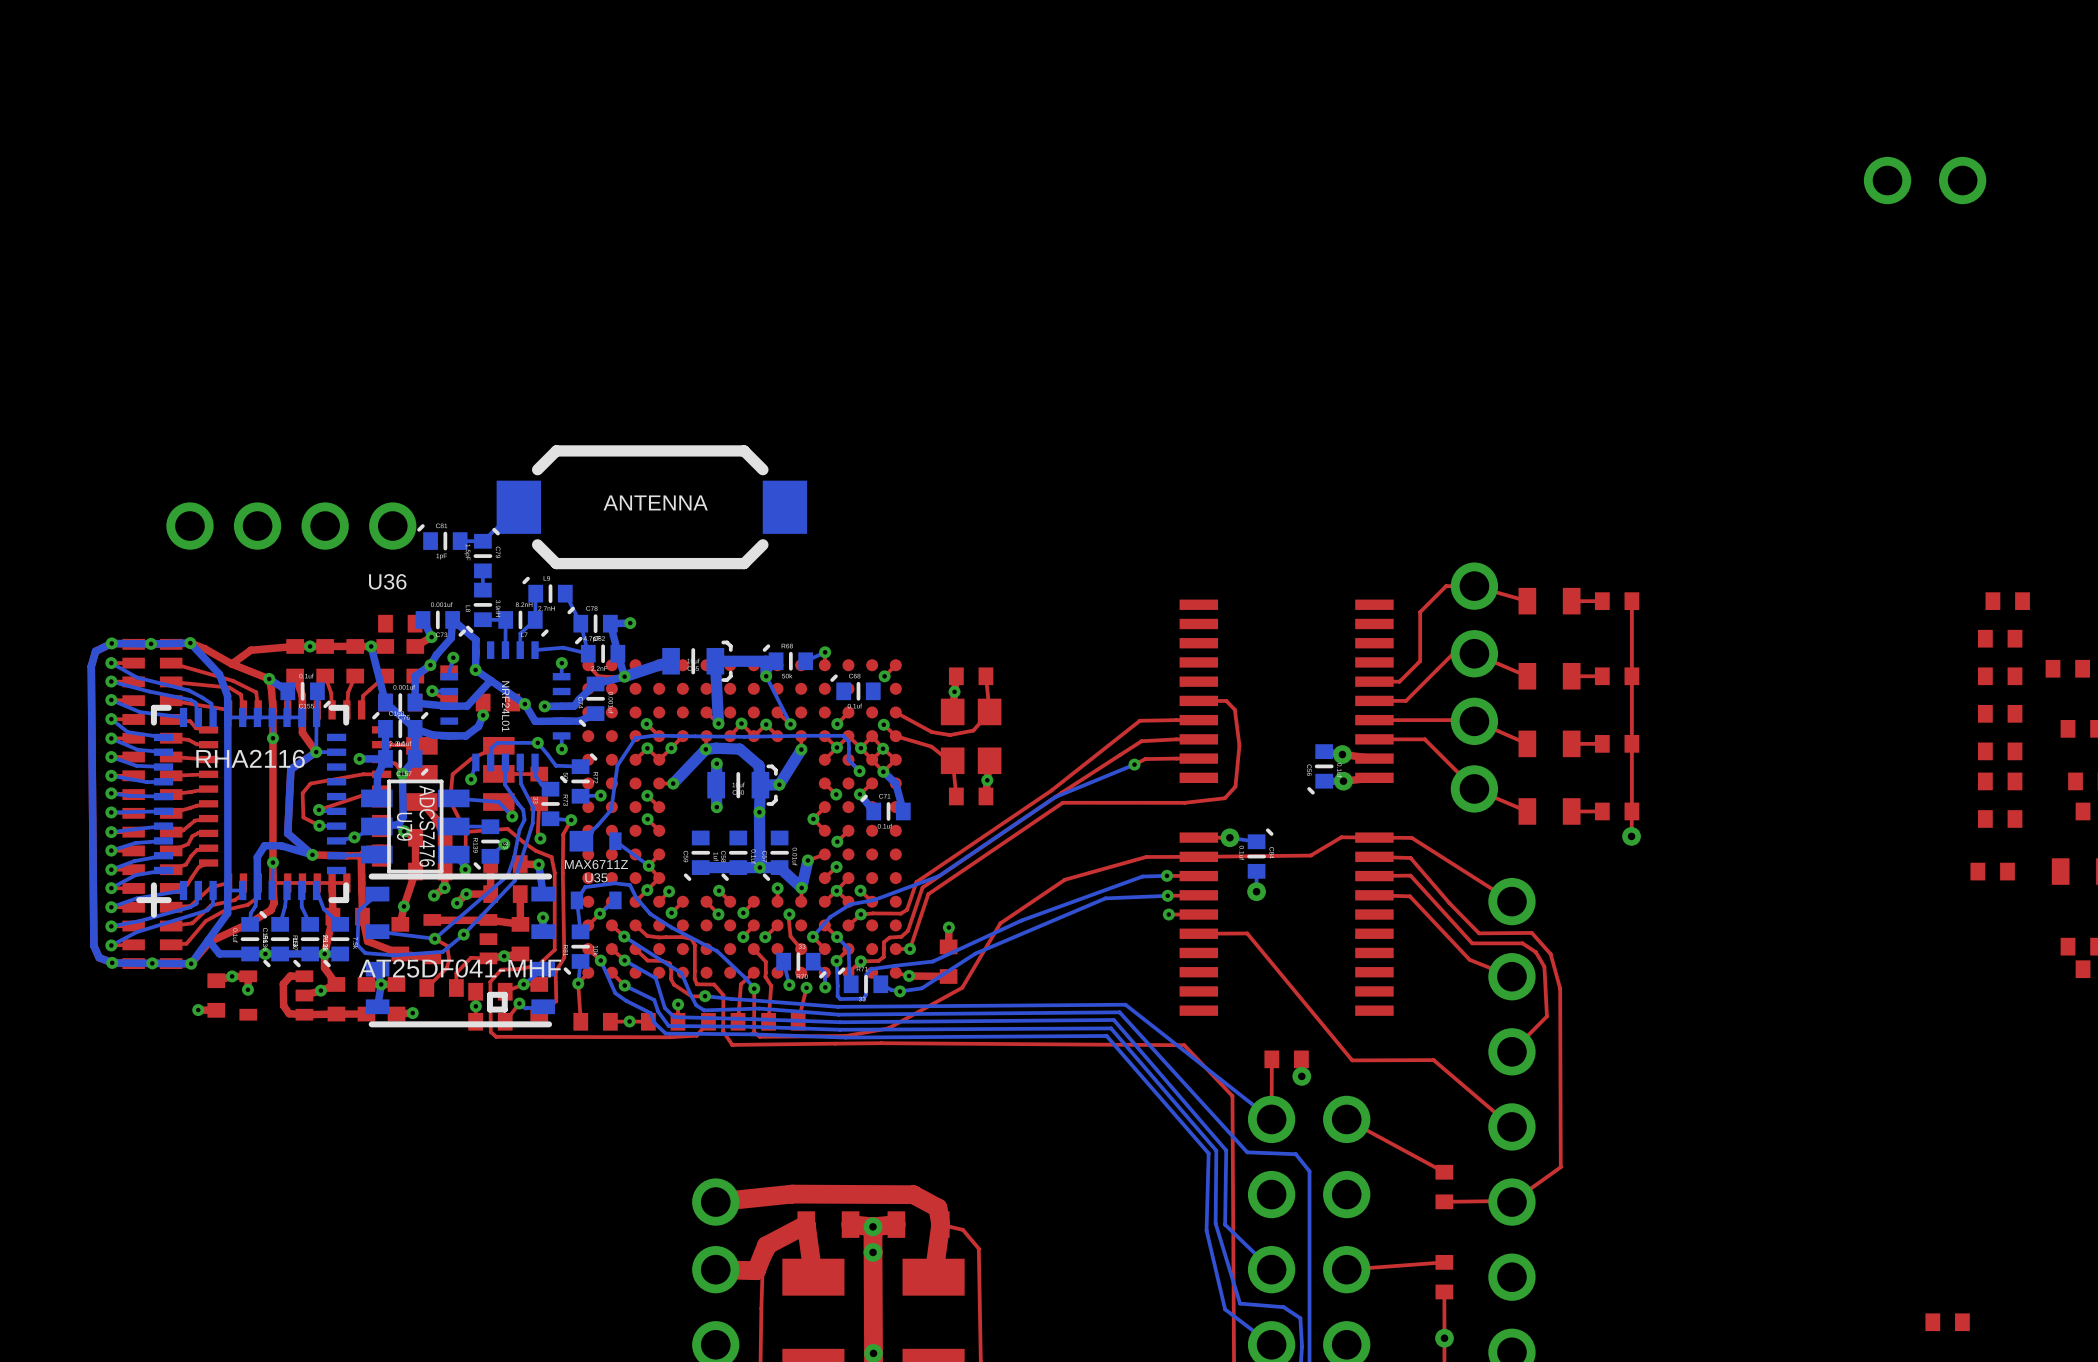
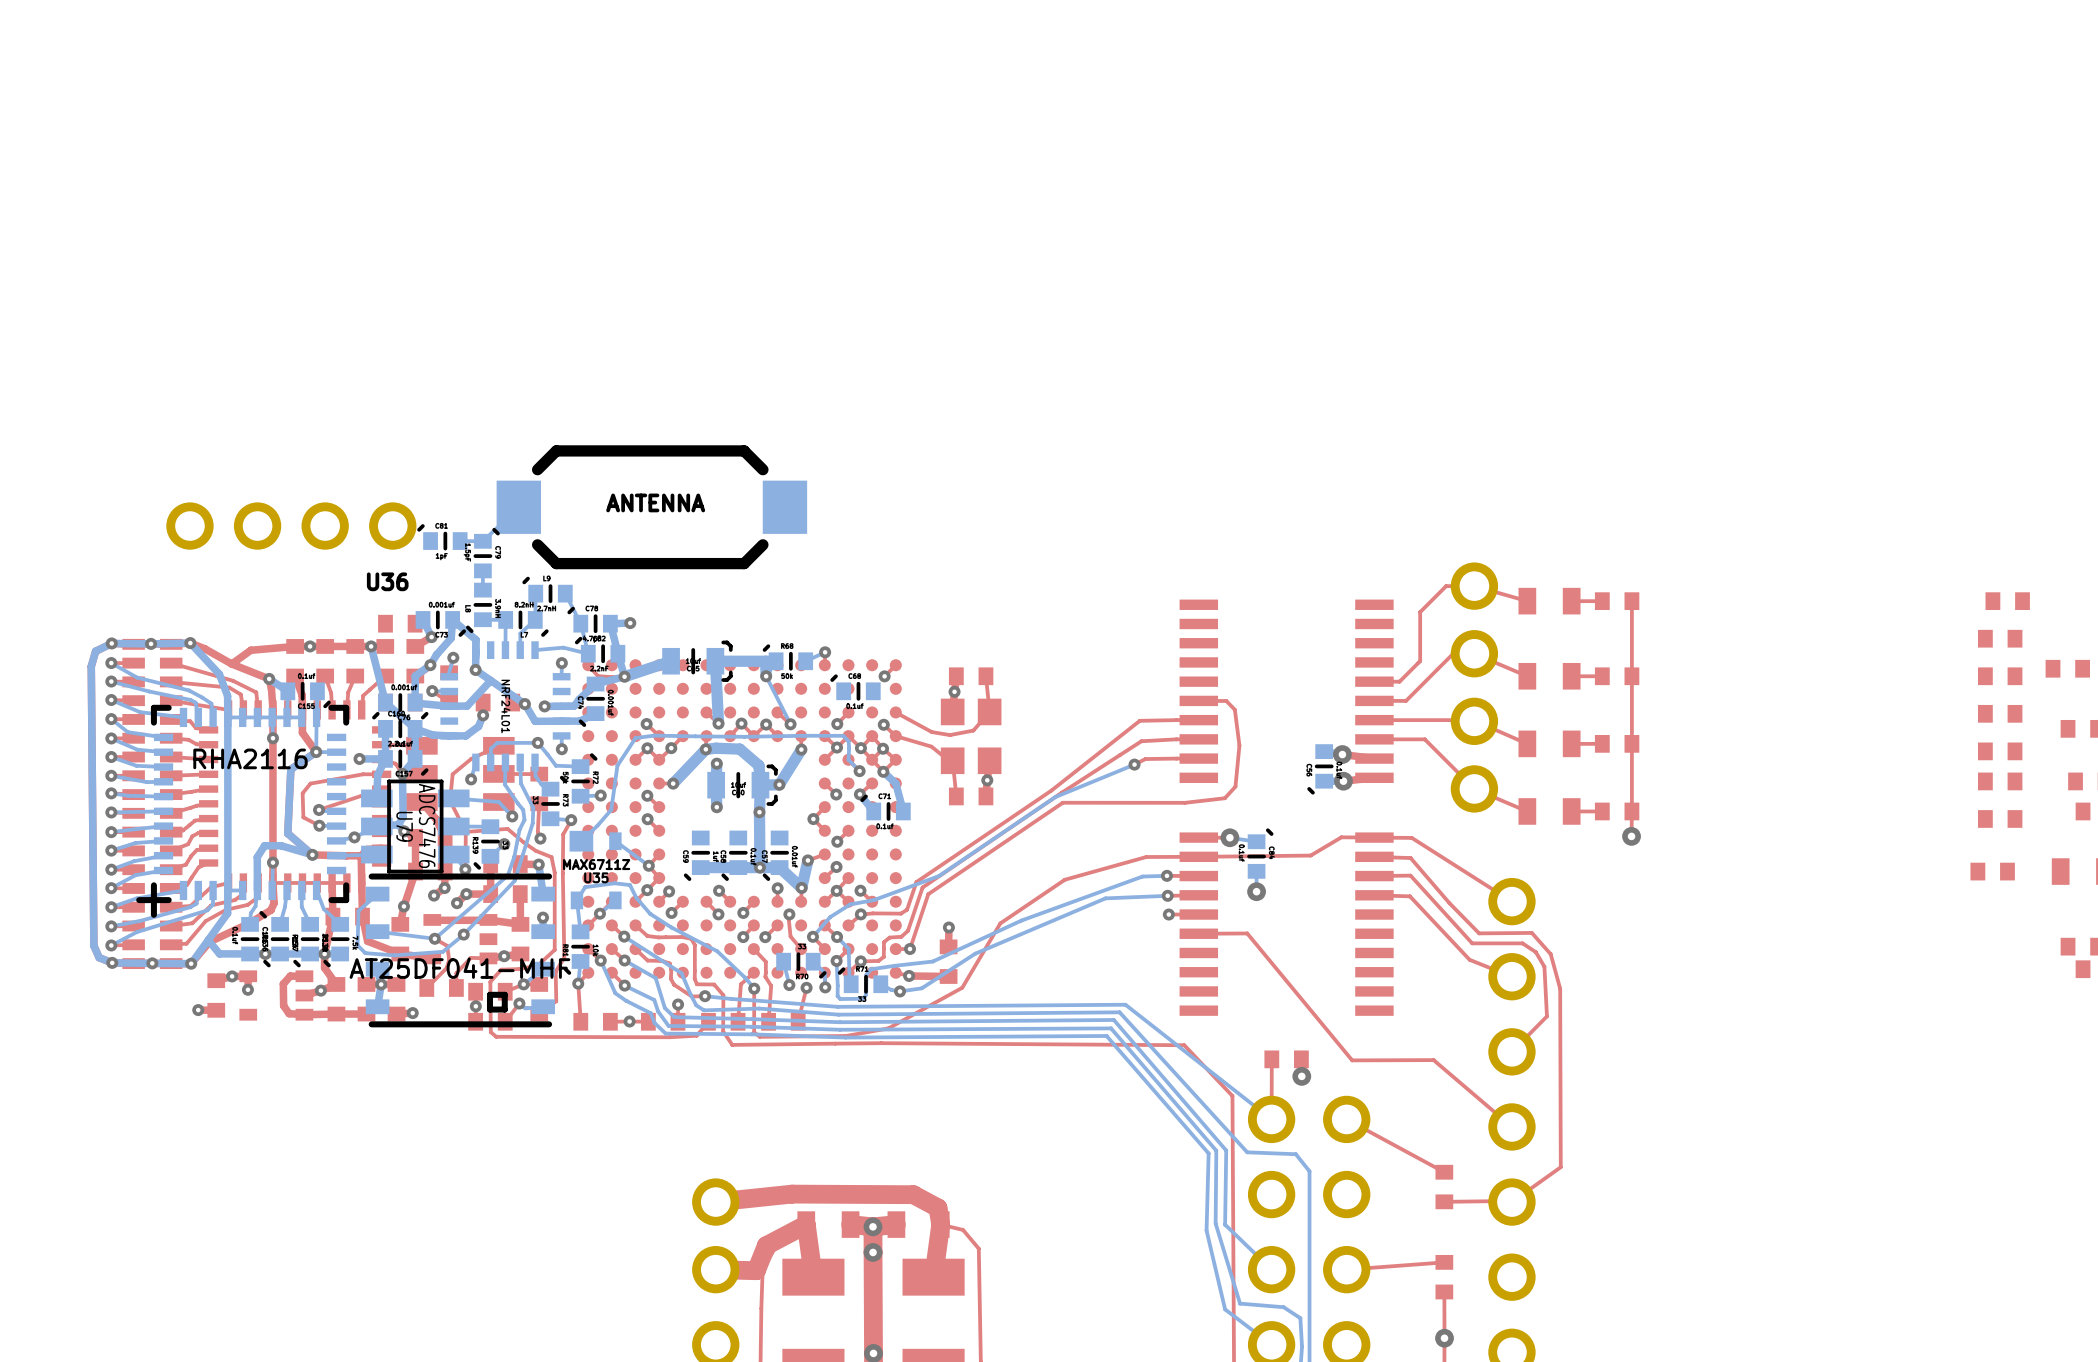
part: (1925, 180) -> none
part: (1947, 1322) -> none

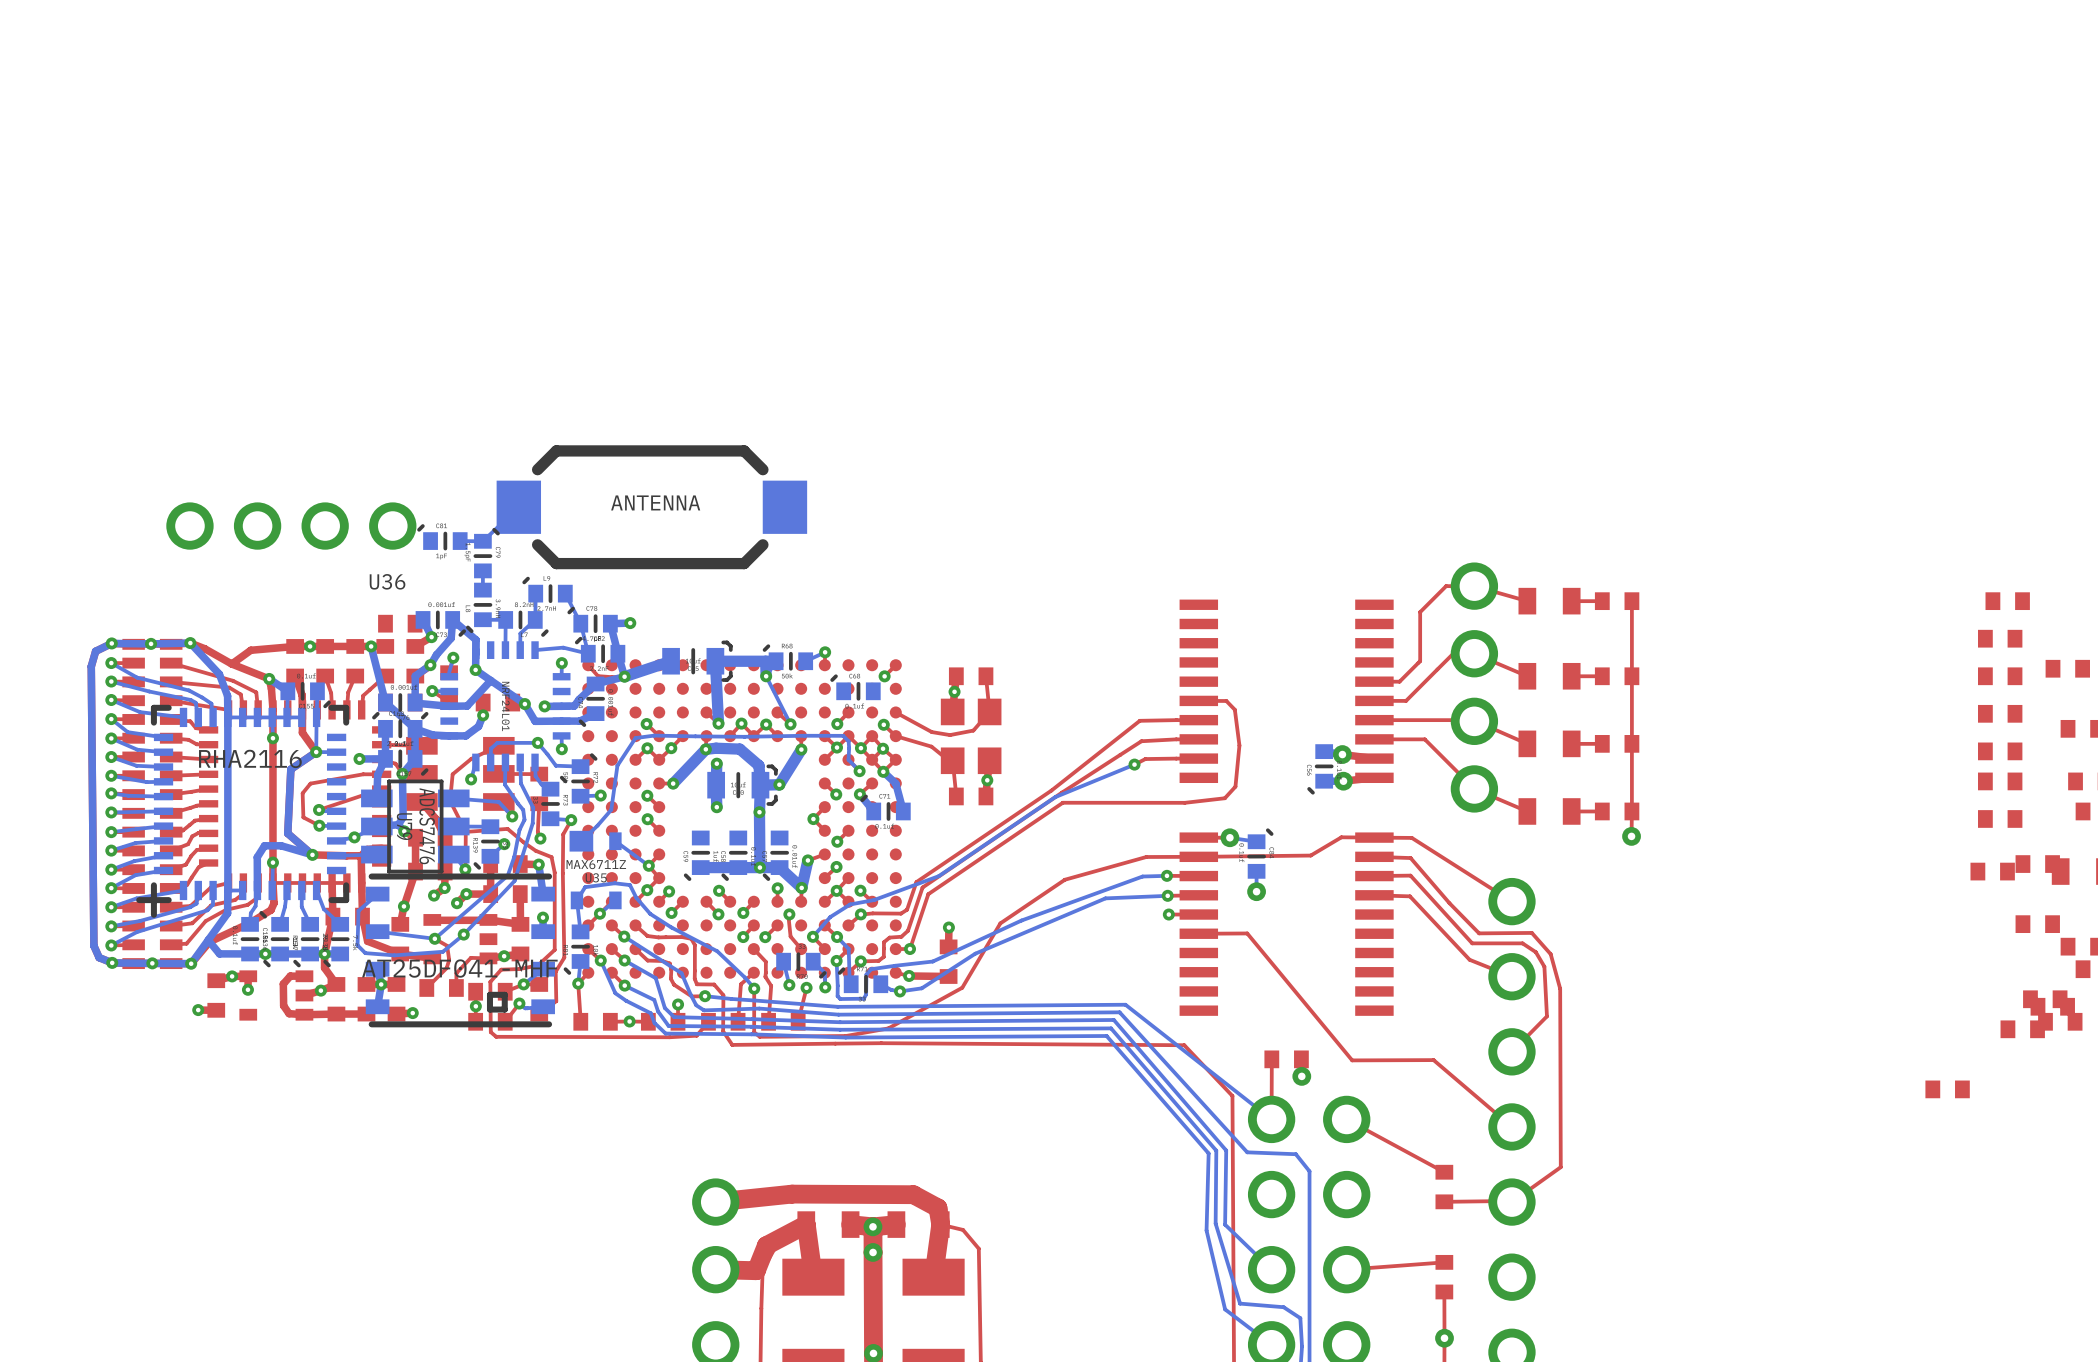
part: none -> (2037, 864)
part: none -> (2037, 924)
part: none -> (2045, 999)
part: none -> (2052, 1006)
part: none -> (2060, 1021)
part: none -> (2022, 1029)
part: none -> (1947, 1089)

